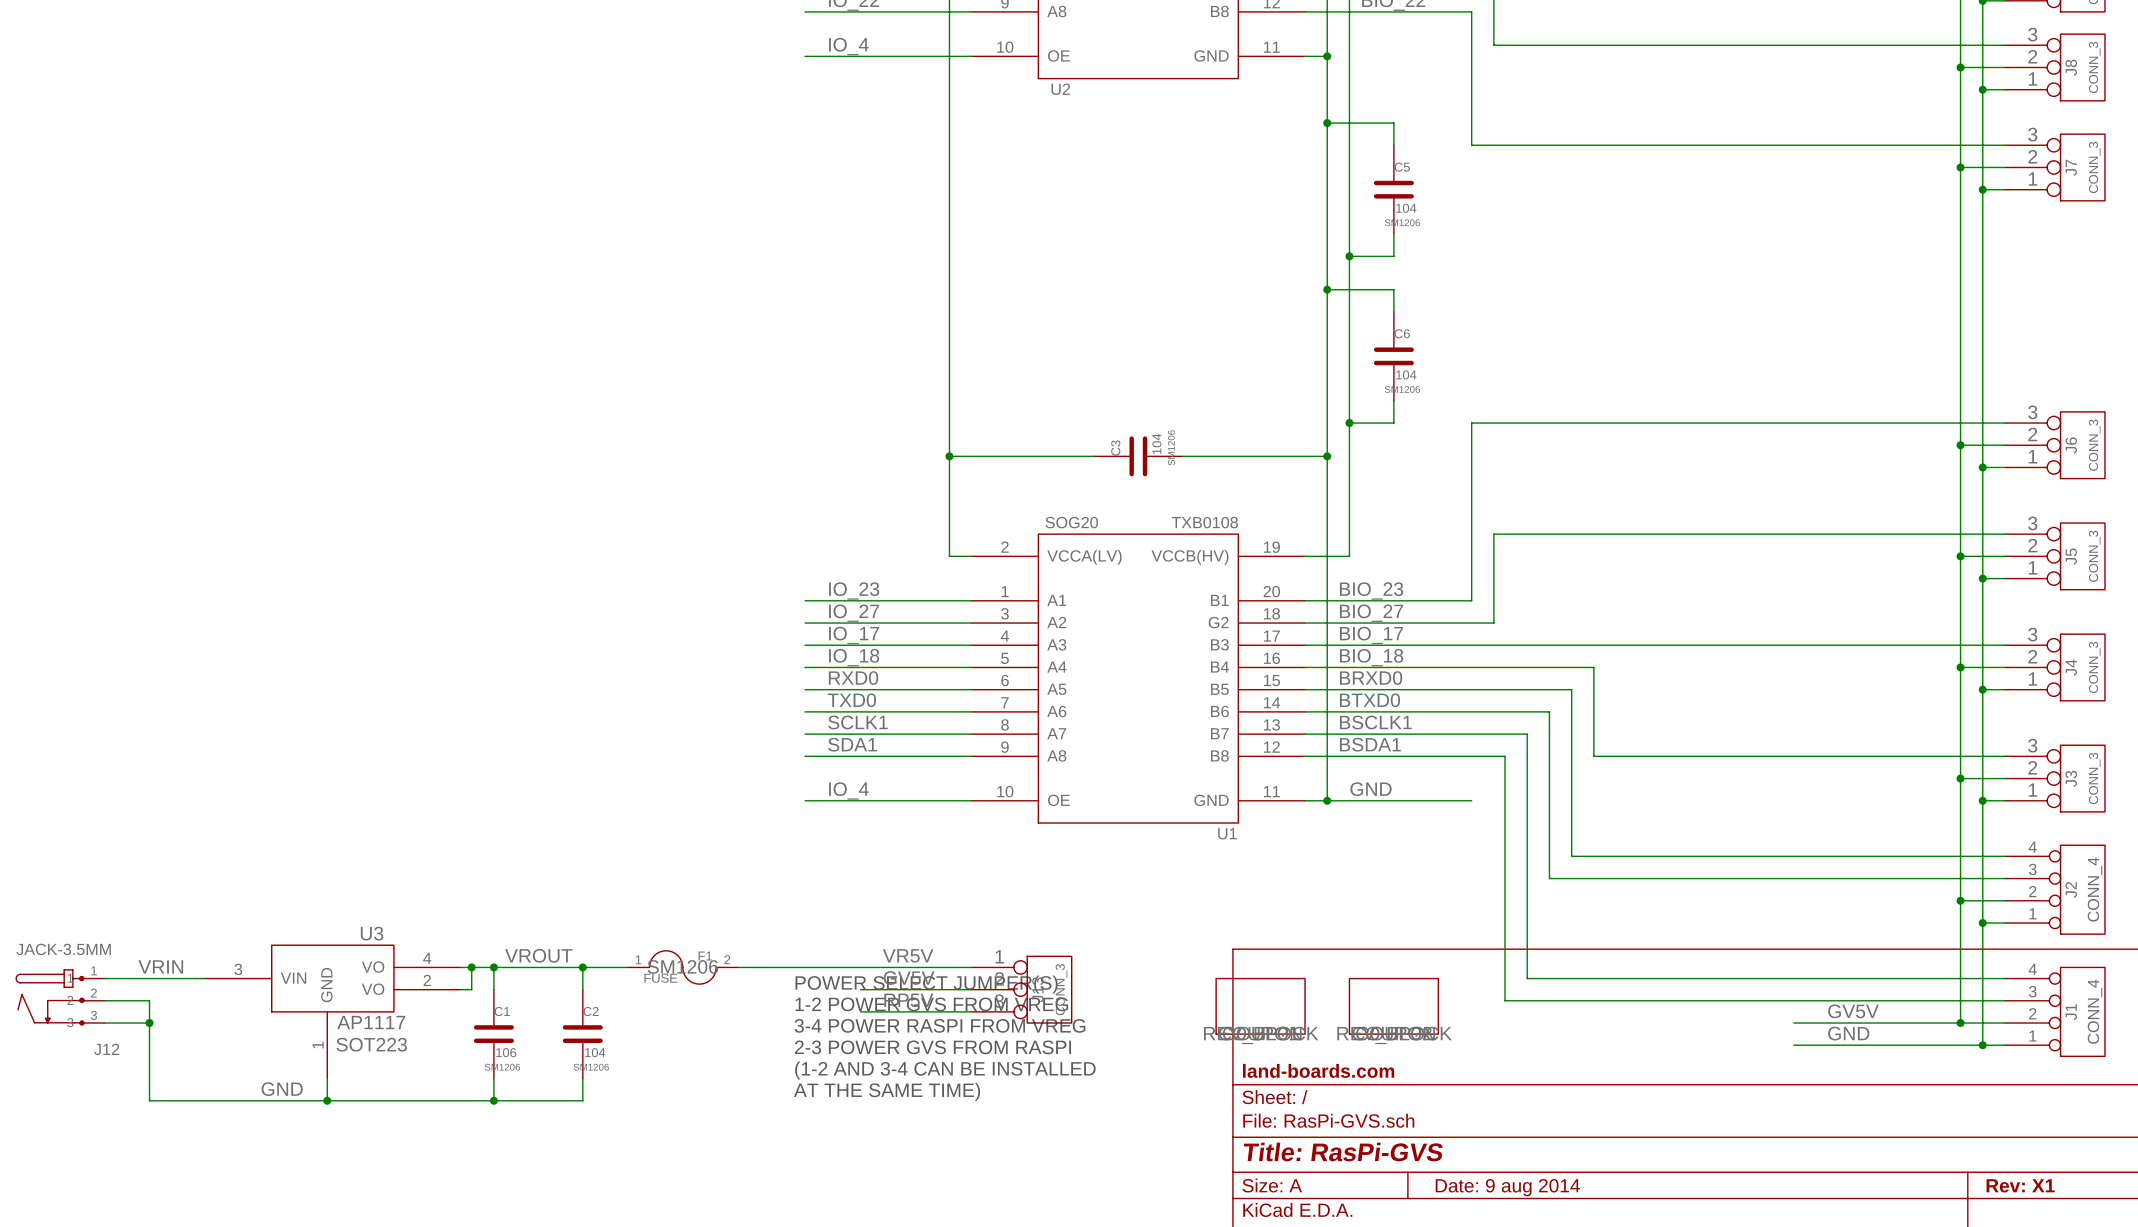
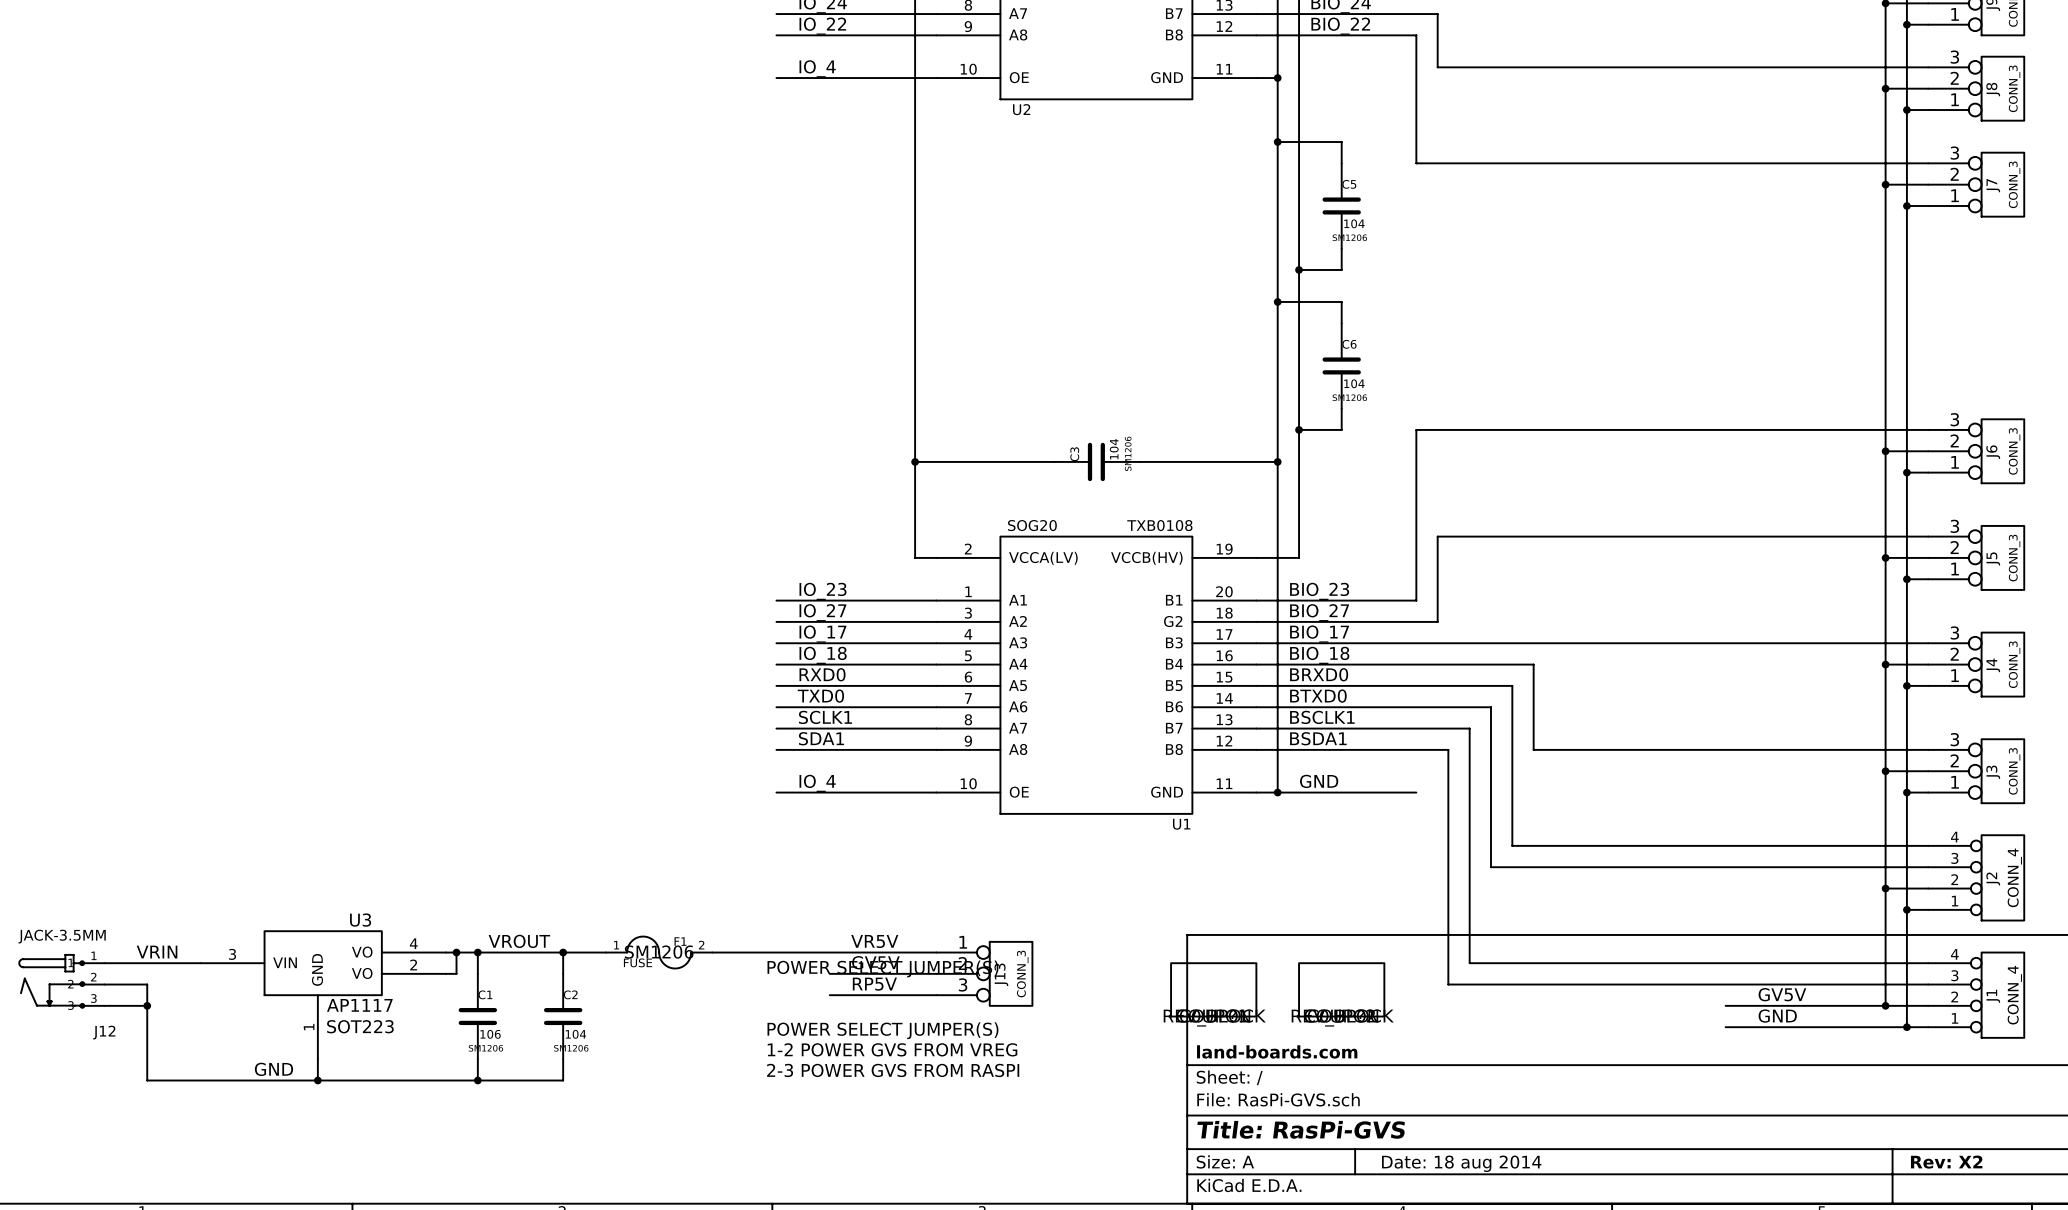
text: 1-2 POWER GVS FROM VREG (931, 1004) -> none
text: 3-4 POWER RASPI FROM VREG (940, 1025) -> none
text: 2-3 POWER GVS FROM RASPI (932, 1047) -> POWER SELECT JUMPER(S) (882, 1030)
text: (1-2 AND 3-4 CAN BE INSTALLED (945, 1070) -> 1-2 POWER GVS FROM VREG (892, 1049)
text: AT THE SAME TIME) (887, 1091) -> 2-3 POWER GVS FROM RASPI (893, 1070)
title block: Rev: X1 (2020, 1185) -> Rev: X2 (1946, 1162)
title block: Date: 9 aug 2014 (1507, 1187) -> Date: 18 aug 2014 (1461, 1163)

